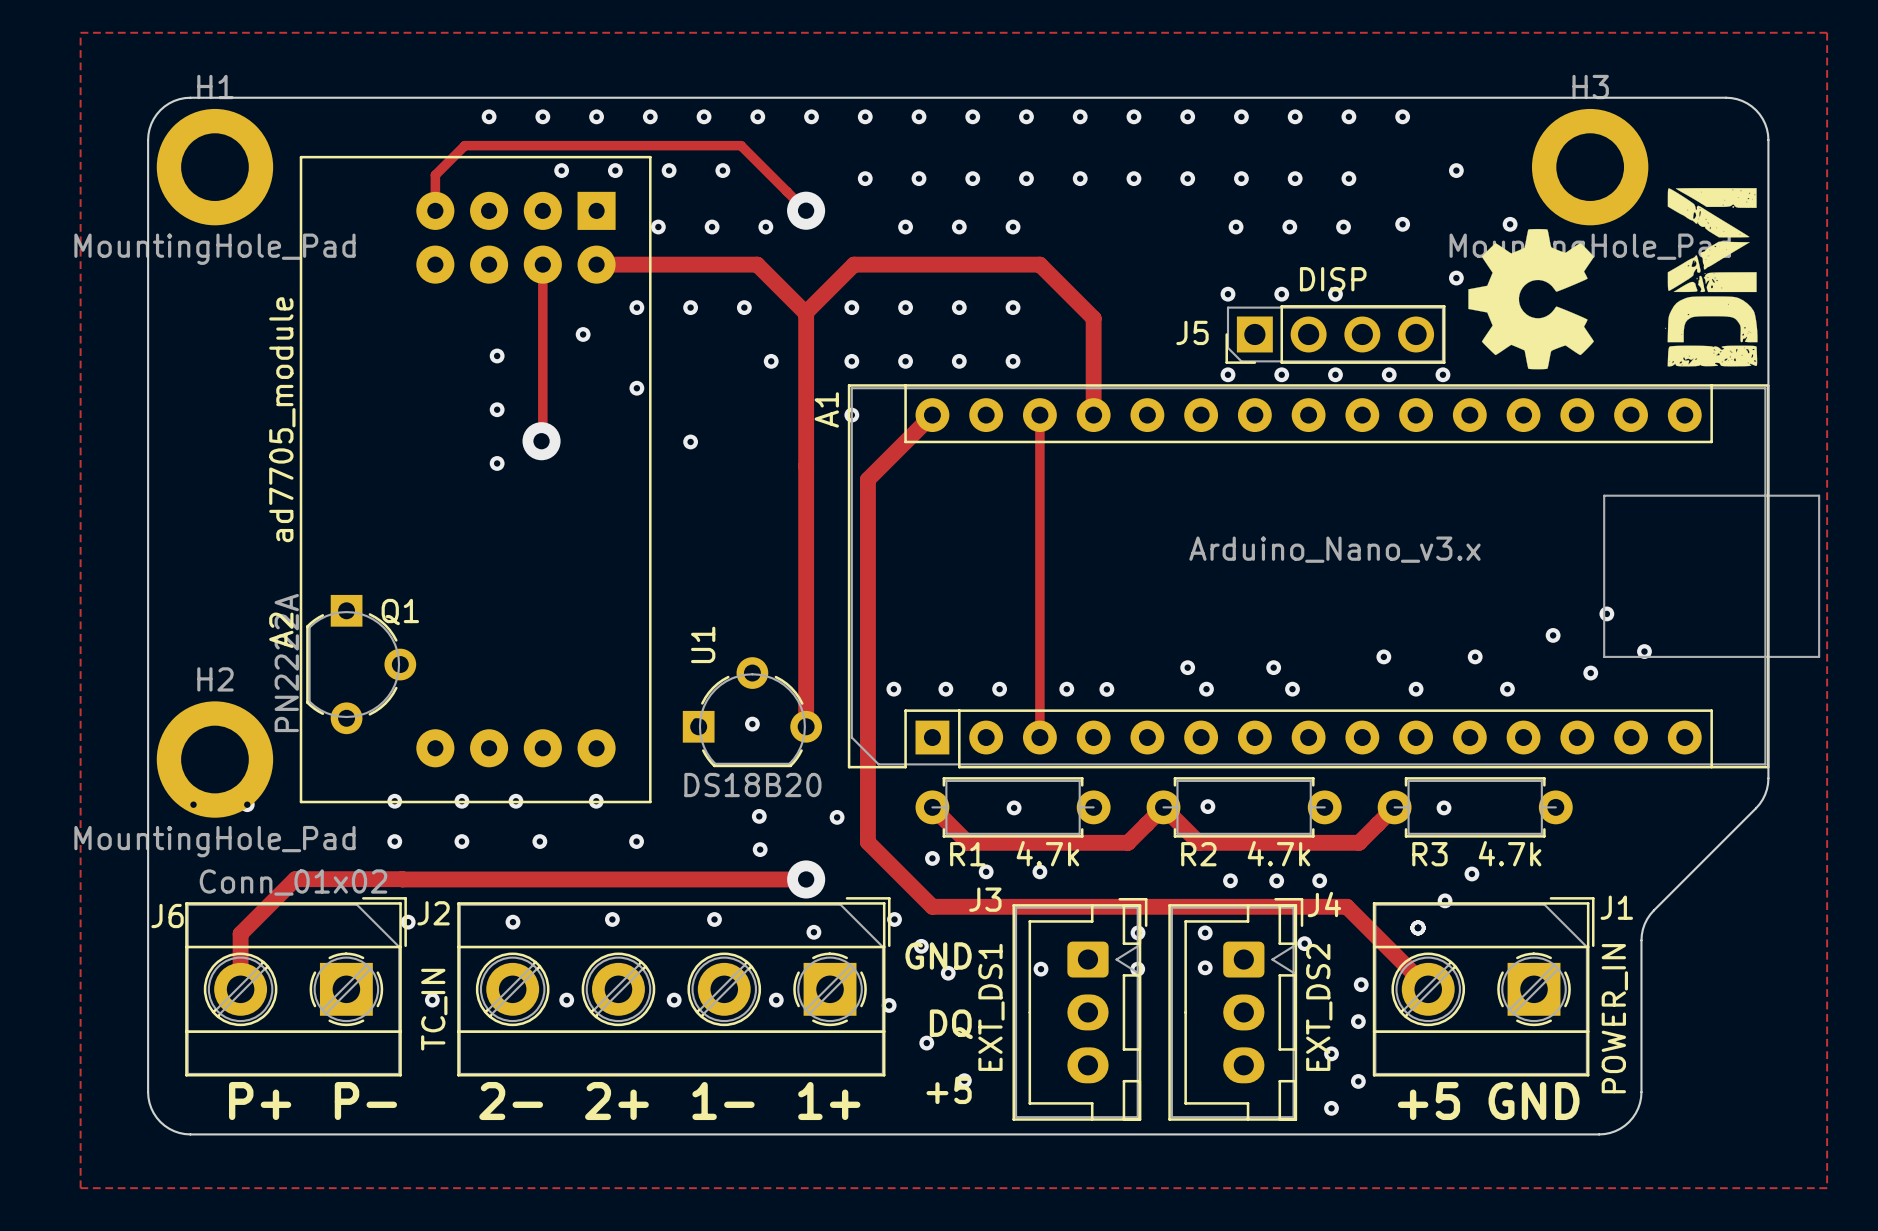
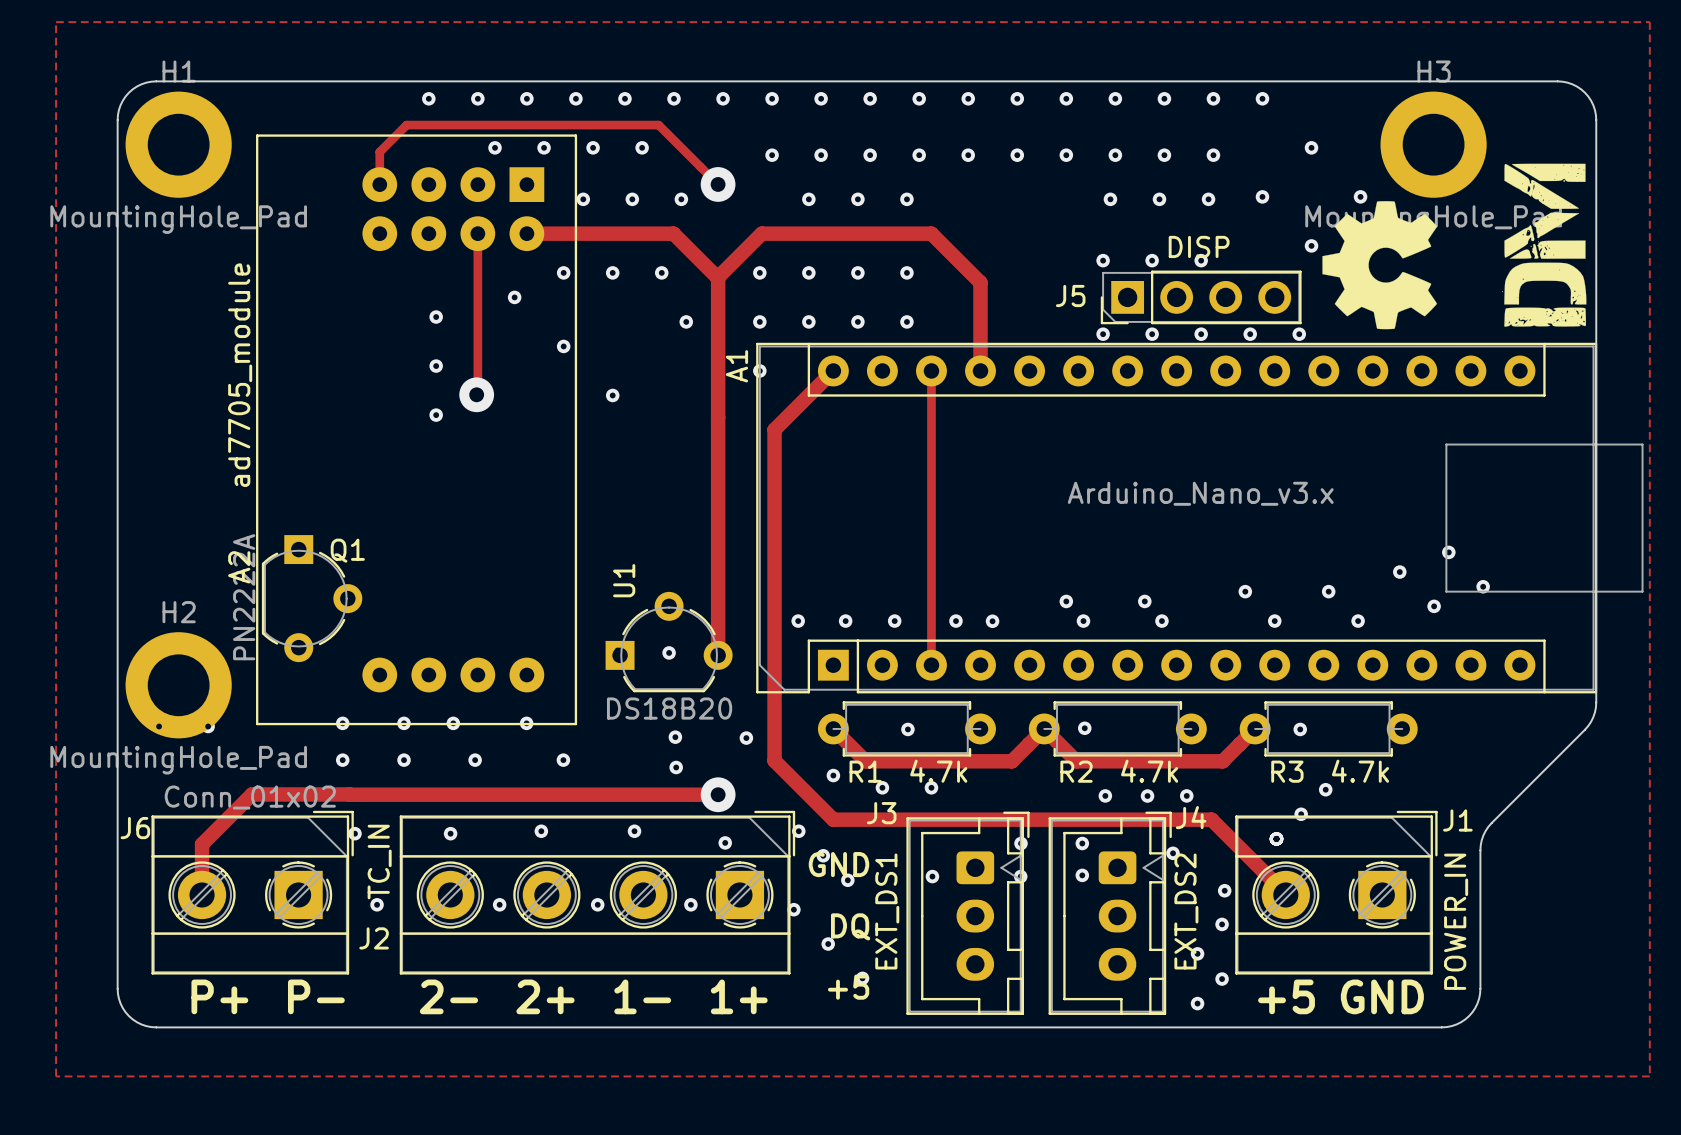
J2 name position: J2 (433, 913) -> J2 (374, 938)
J2 value position: TC_IN (434, 1009) -> TC_IN (379, 862)

